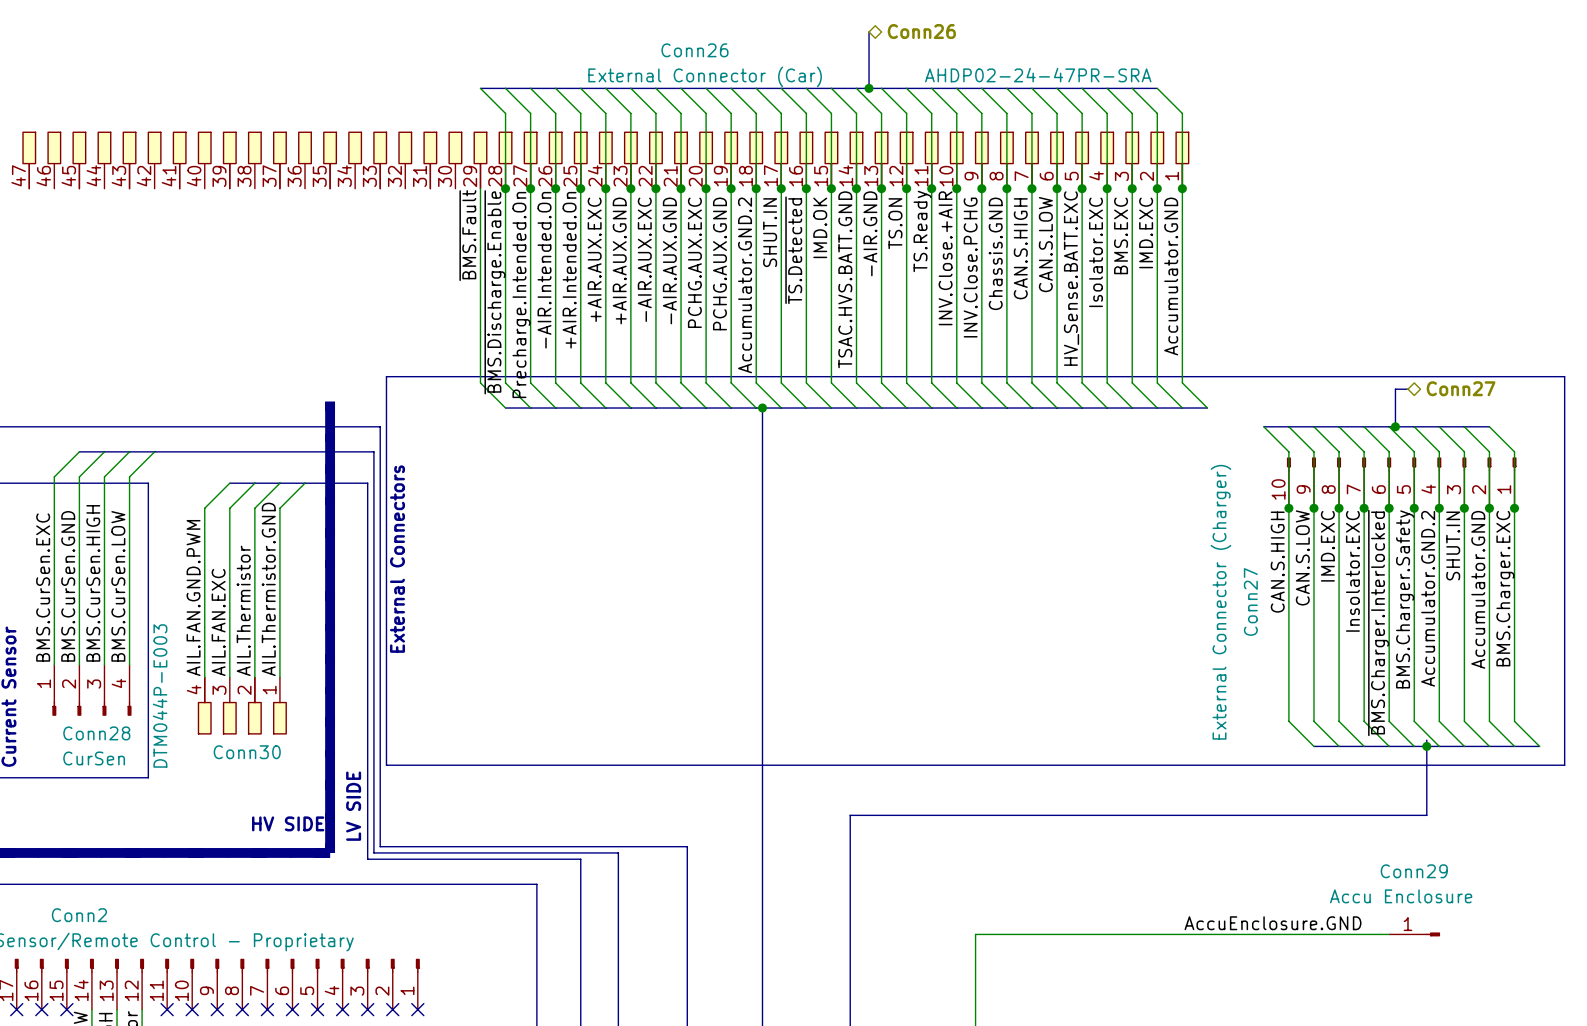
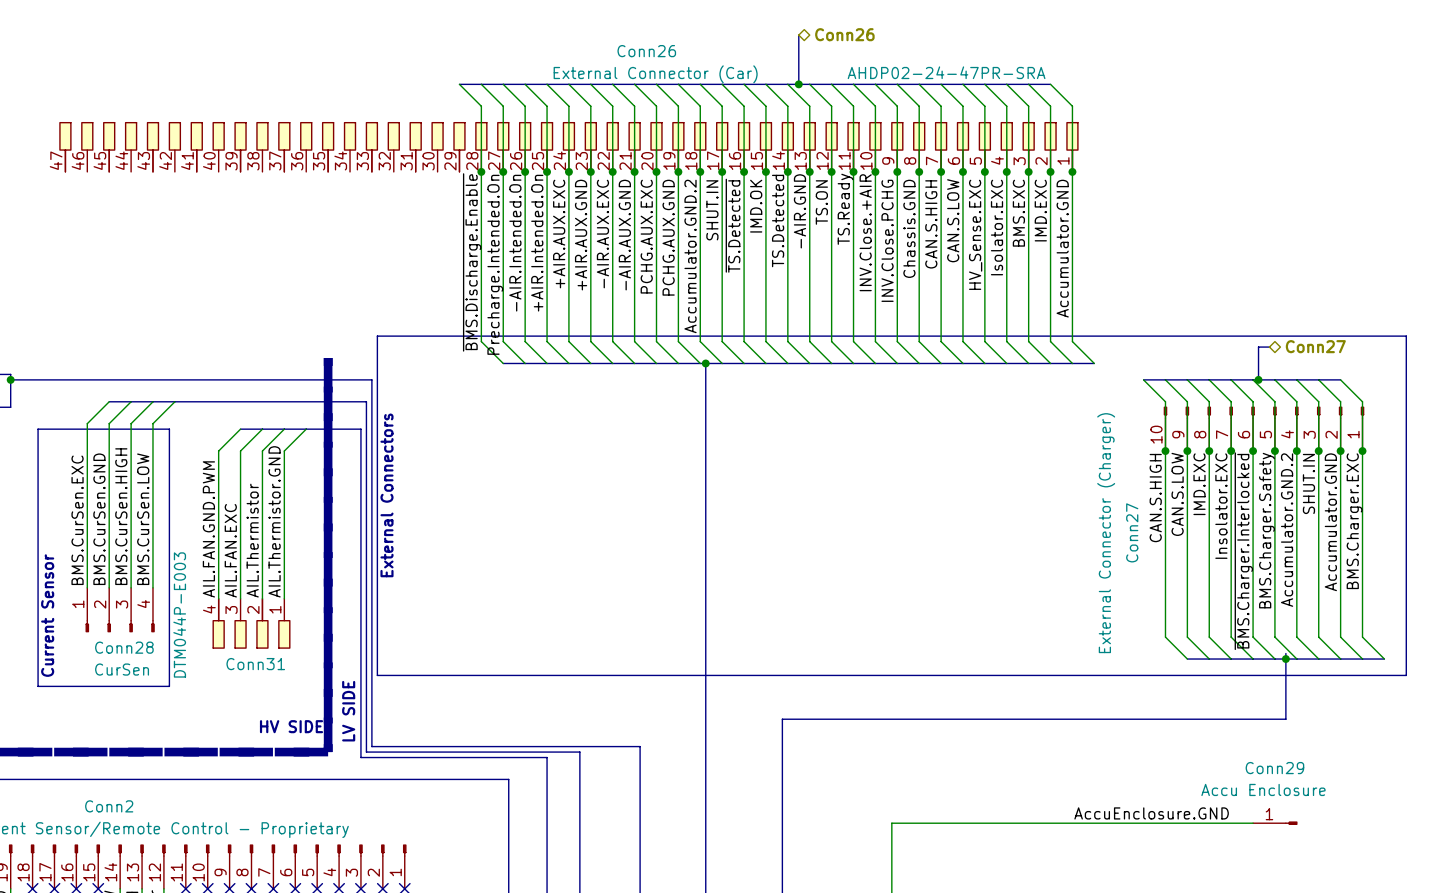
wire: (480, 188) (480, 382) (505, 408) -> none
label: ~{BMS.Fault} (467, 235) -> none
label: HV_Sense.BATT.EXC (1071, 278) -> HV_Sense.EXC (975, 234)
label: TSAC.HVS.BATT.GND (845, 279) -> TS.Detected (778, 221)
bus: (505, 408) (530, 408) -> none
Conn30 name: Conn30 (247, 752) -> Conn31 (255, 664)

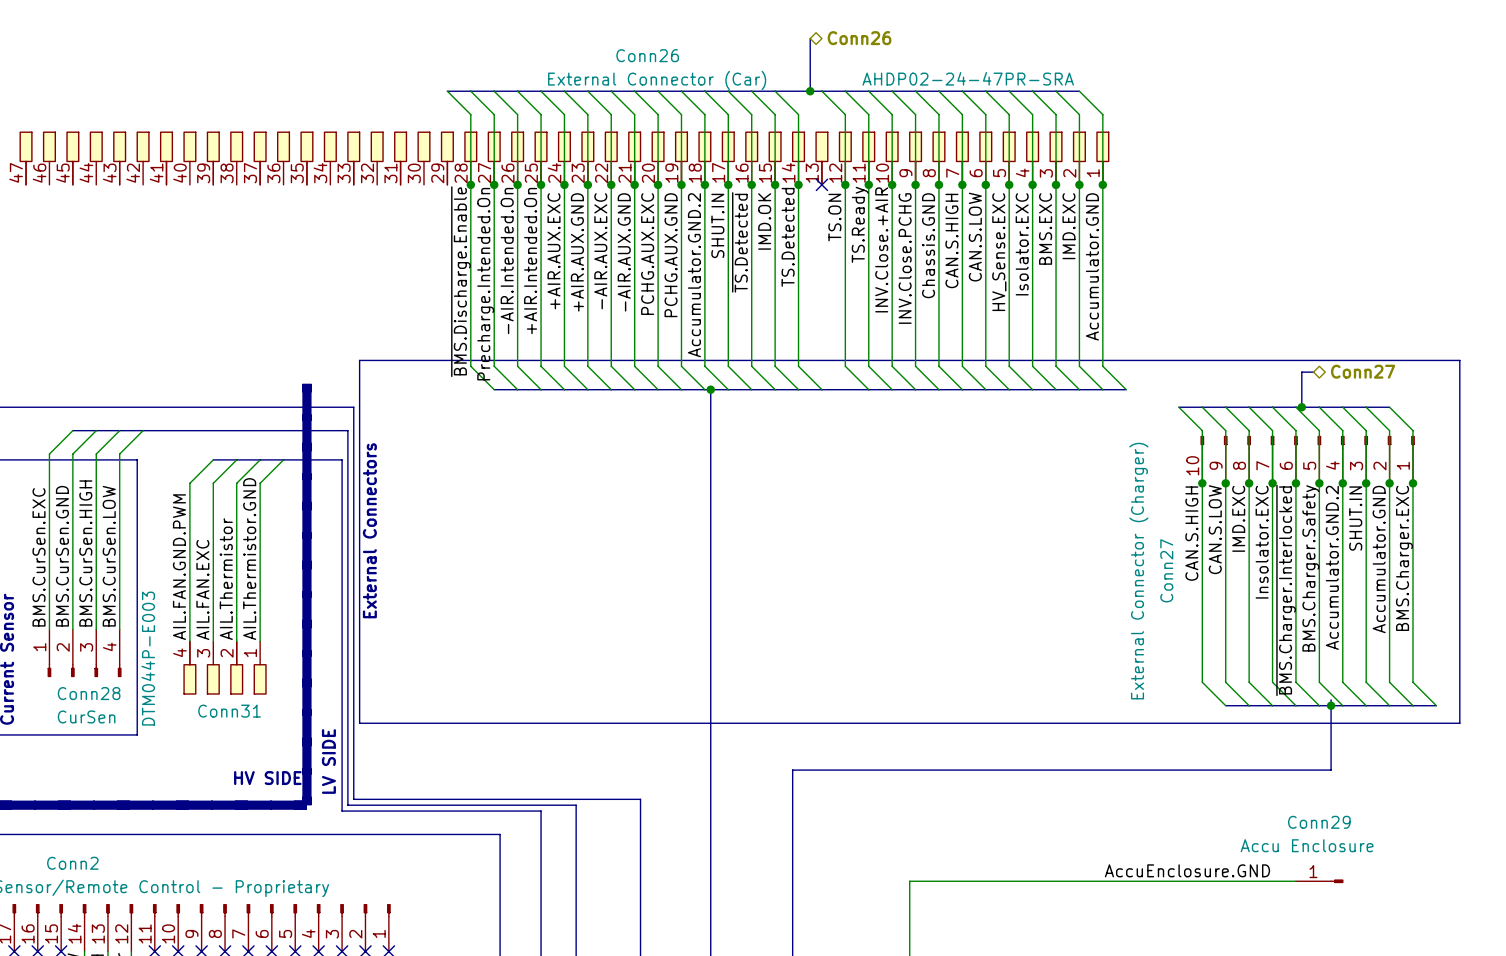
wire: (787, 84) (809, 106) (809, 341) (831, 363) -> none
junction: (809, 171) -> none
no-connect mark: none -> (821, 184)
label: -AIR.GND (799, 211) -> none

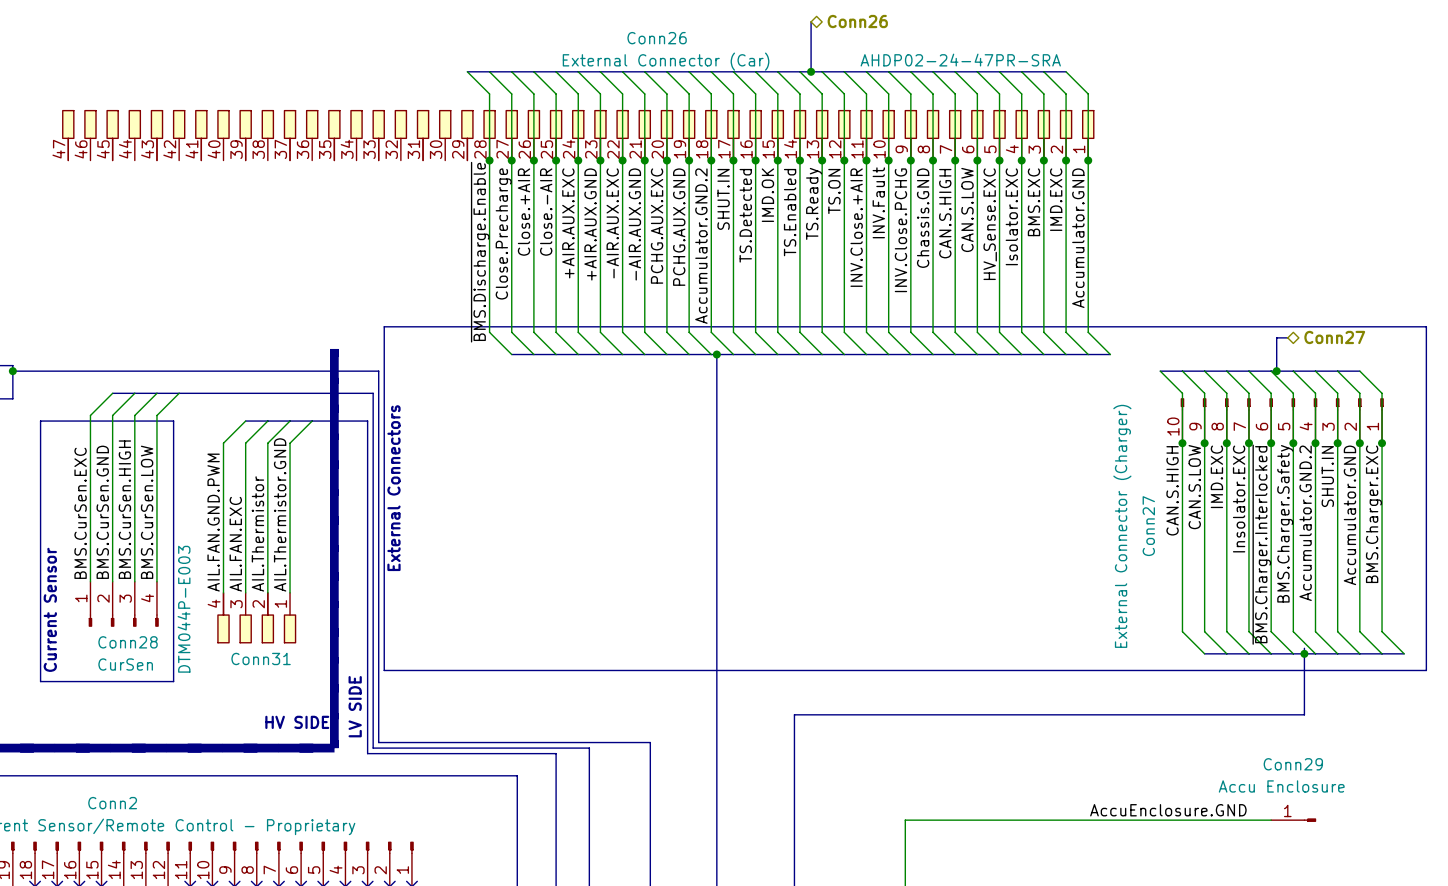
wire: none -> (799, 71) (822, 93) (822, 332) (844, 354)
no-connect mark: (821, 184) -> none
junction: none -> (822, 160)
label: TS.Ready (860, 224) -> INV.Close.+AIR (856, 227)
label: none -> TS.Ready (814, 203)
label: TS.Detected (788, 237) -> TS.Enabled (790, 212)
label: ~{TS.Detected} (739, 242) -> TS.Detected (745, 215)
label: INV.Close.+AIR (881, 249) -> INV.Fault (878, 202)
label: -AIR.Intended.On (507, 261) -> Close.+AIR (524, 212)
label: +AIR.Intended.On (530, 261) -> Close.-AIR (546, 212)
label: Precharge.Intended.On (485, 284) -> Close.Precharge (503, 233)

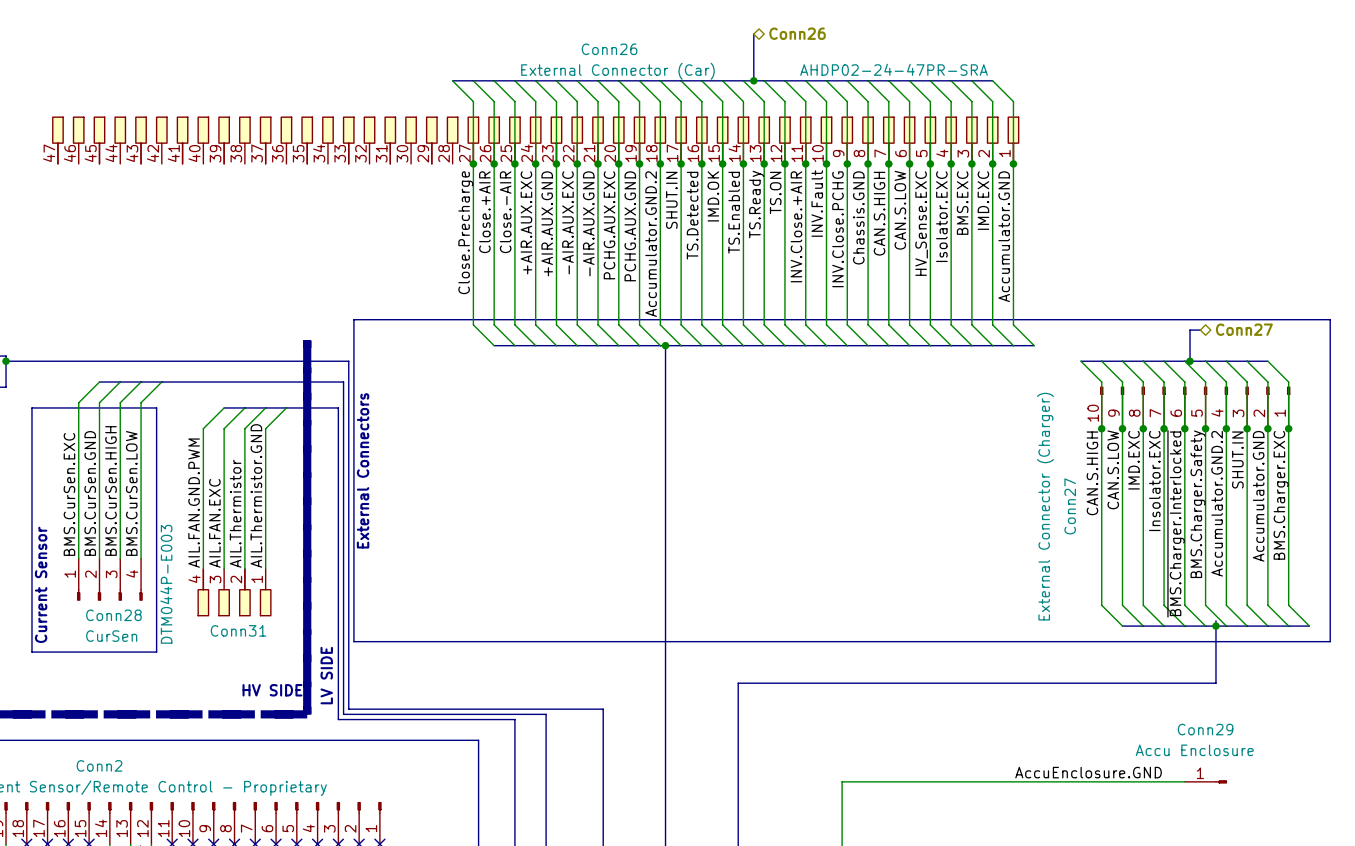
wire: (467, 71) (489, 93) (489, 332) (511, 354) -> none
bus: (467, 71) (489, 71) -> none
junction: (489, 160) -> none
label: ~{BMS.Discharge.Enable} (480, 252) -> none
bus: (511, 354) (533, 354) -> none

